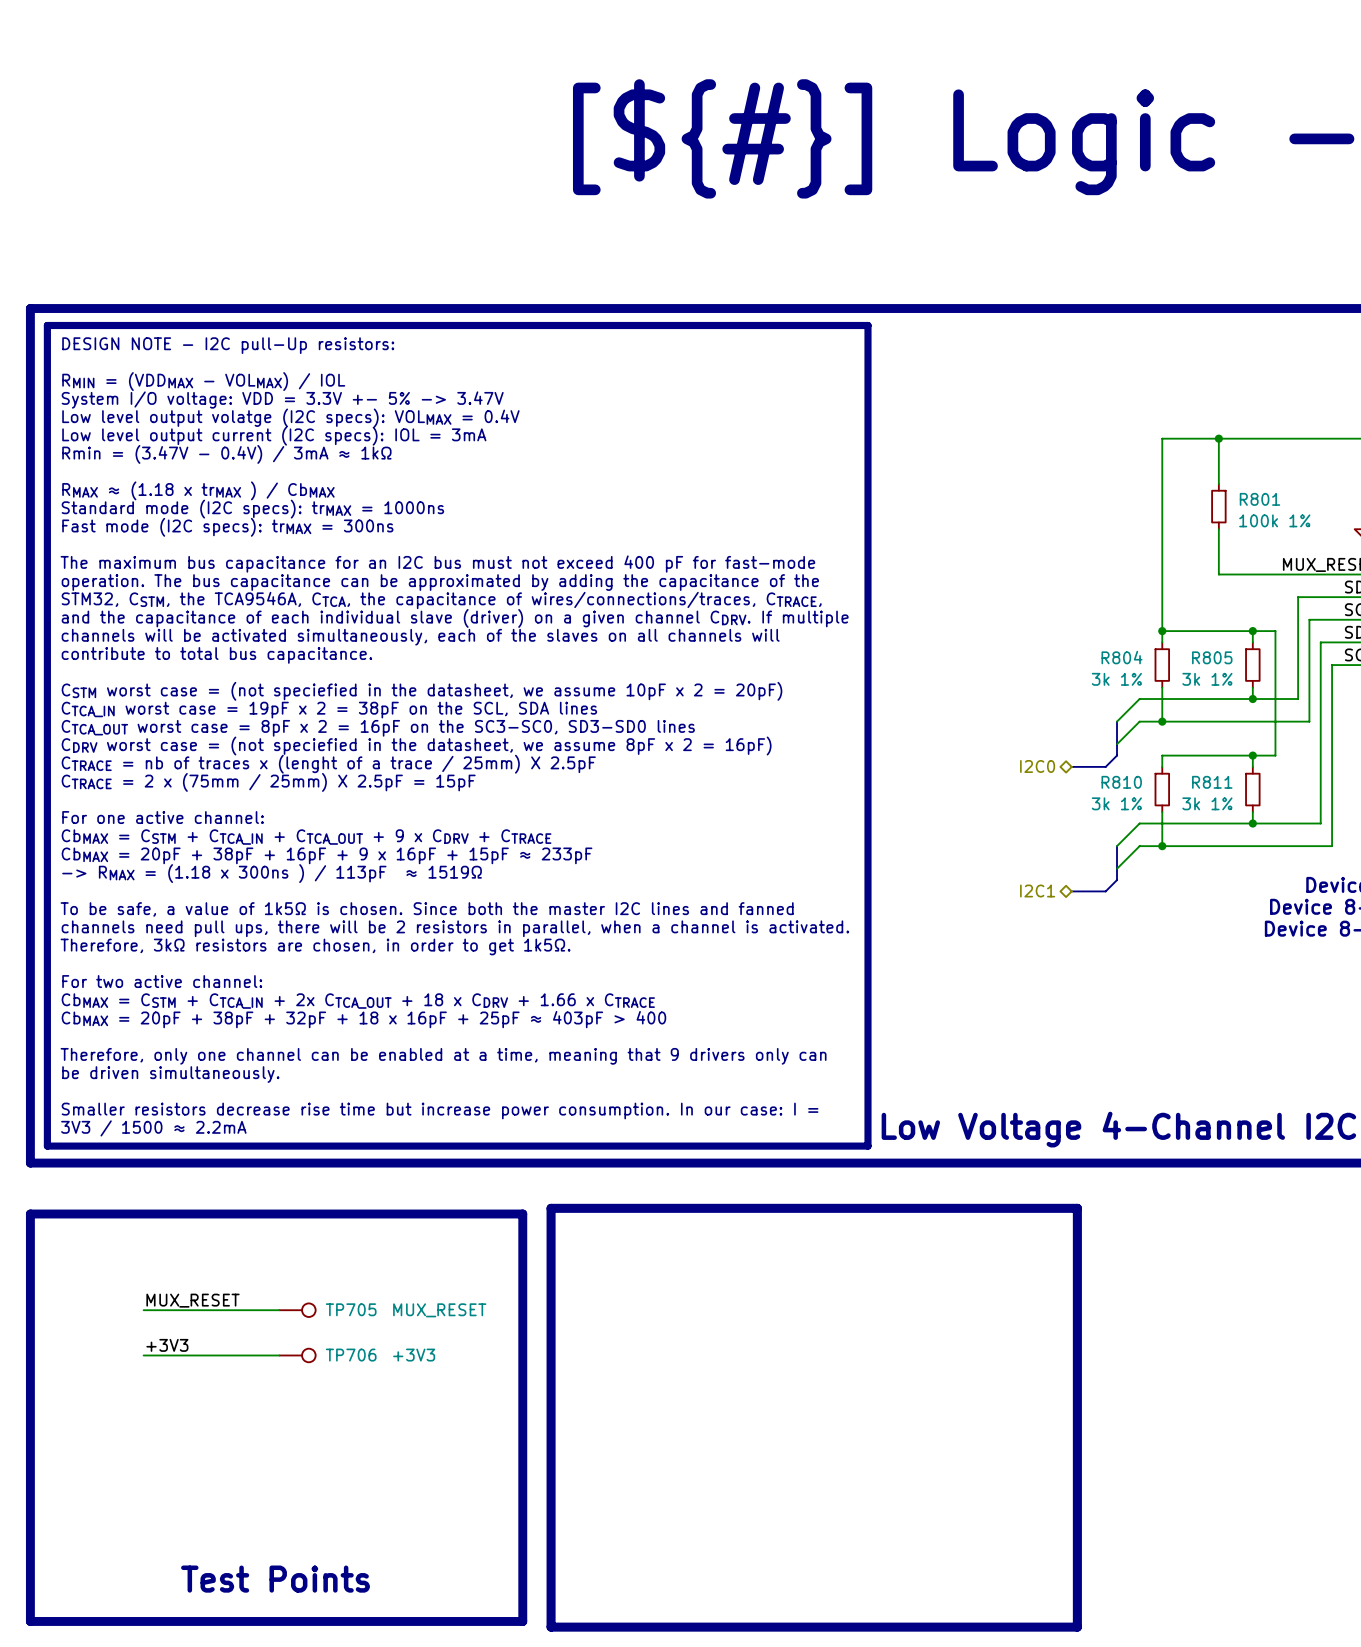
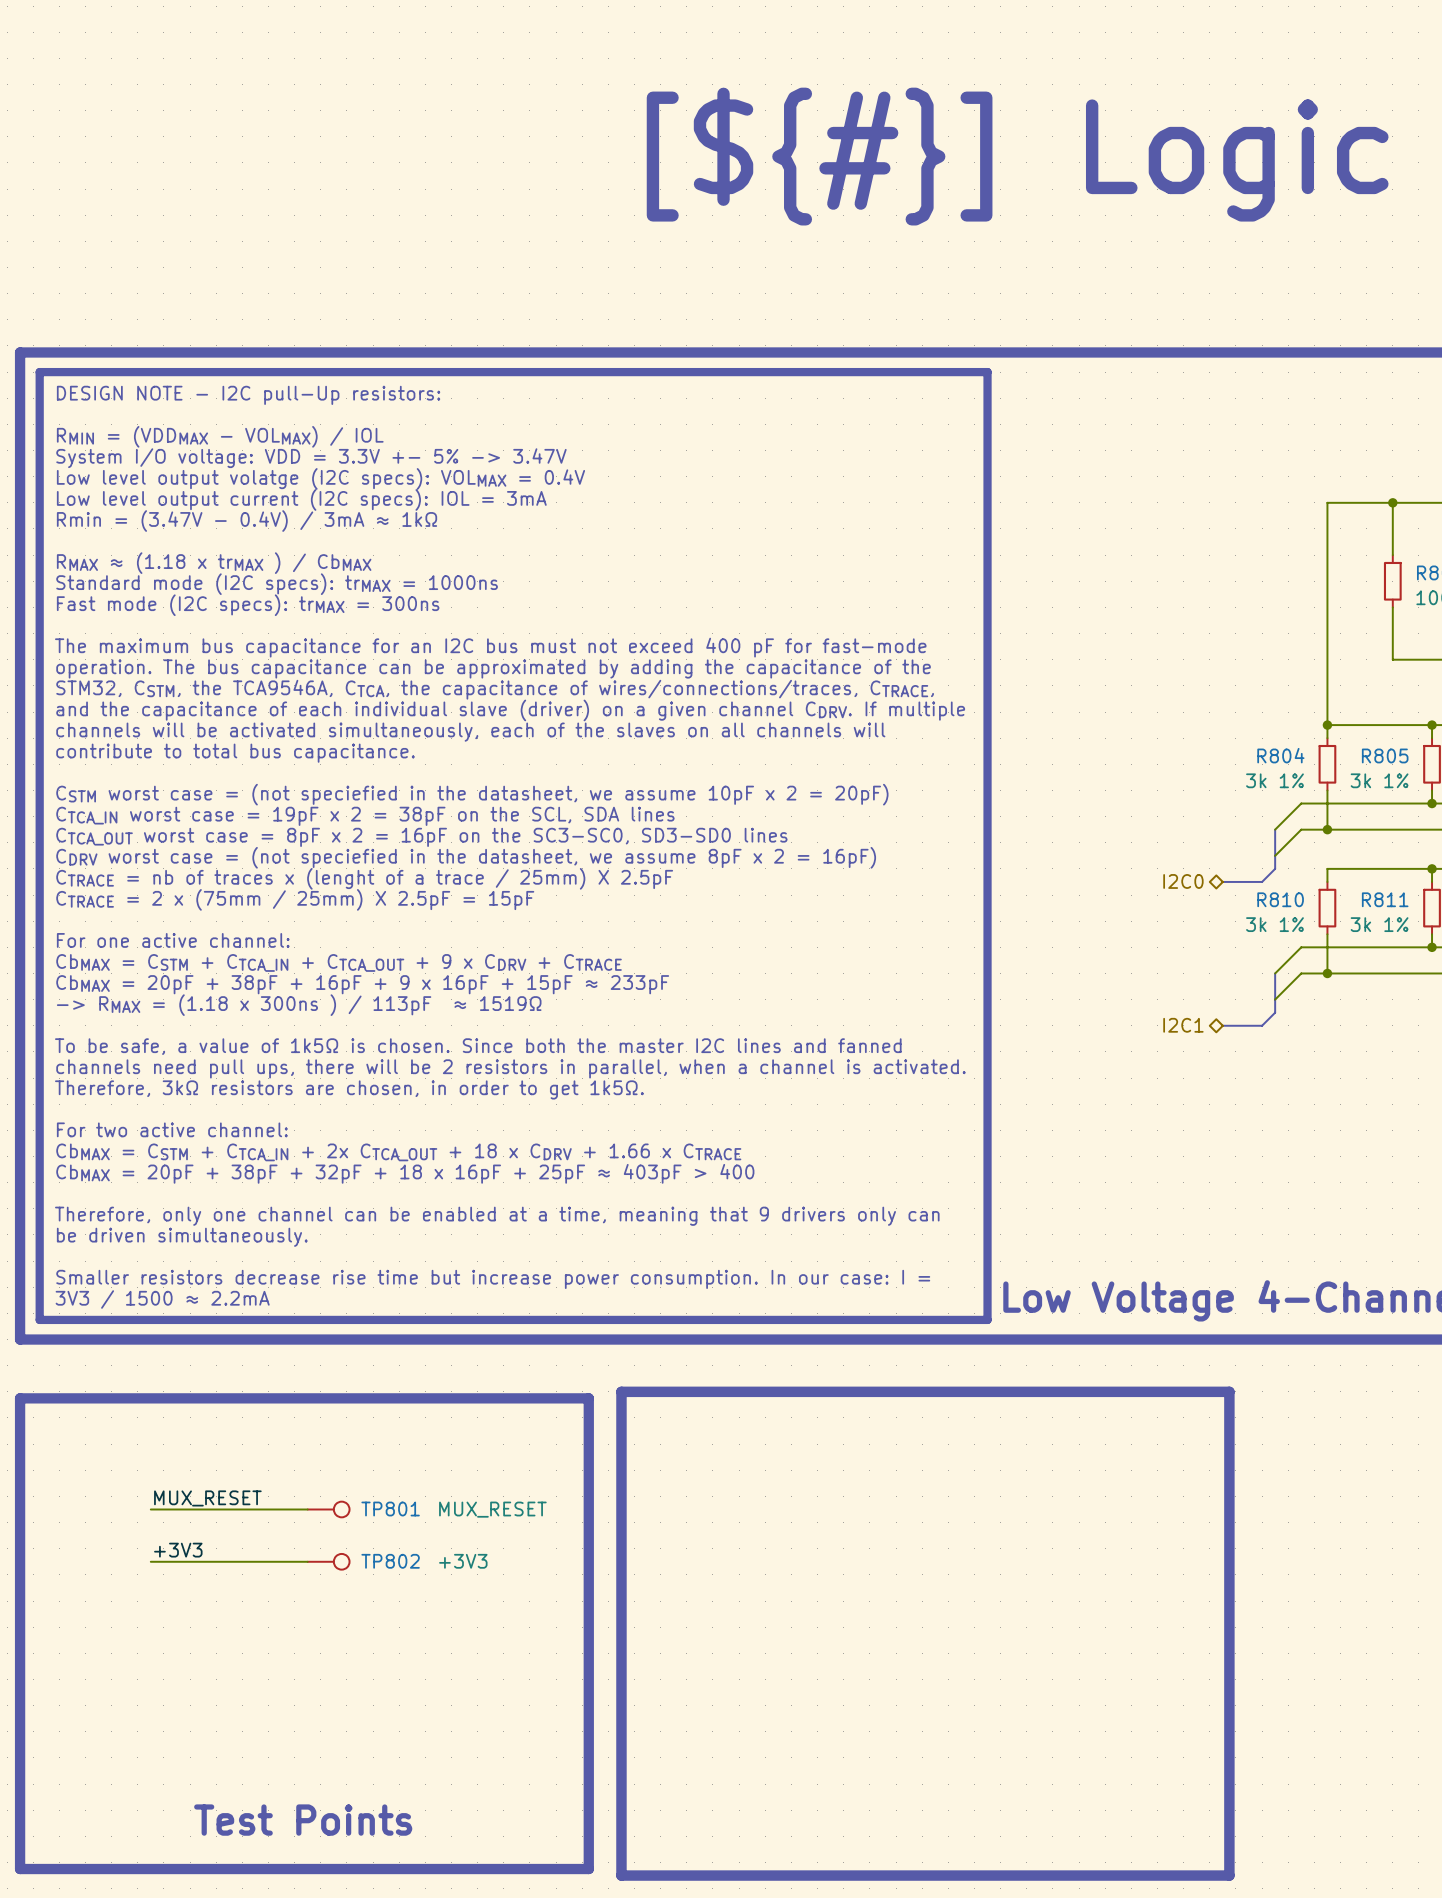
TP705 name: TP705 (351, 1309) -> TP801 (390, 1509)
TP706 name: TP706 (351, 1355) -> TP802 (390, 1561)

